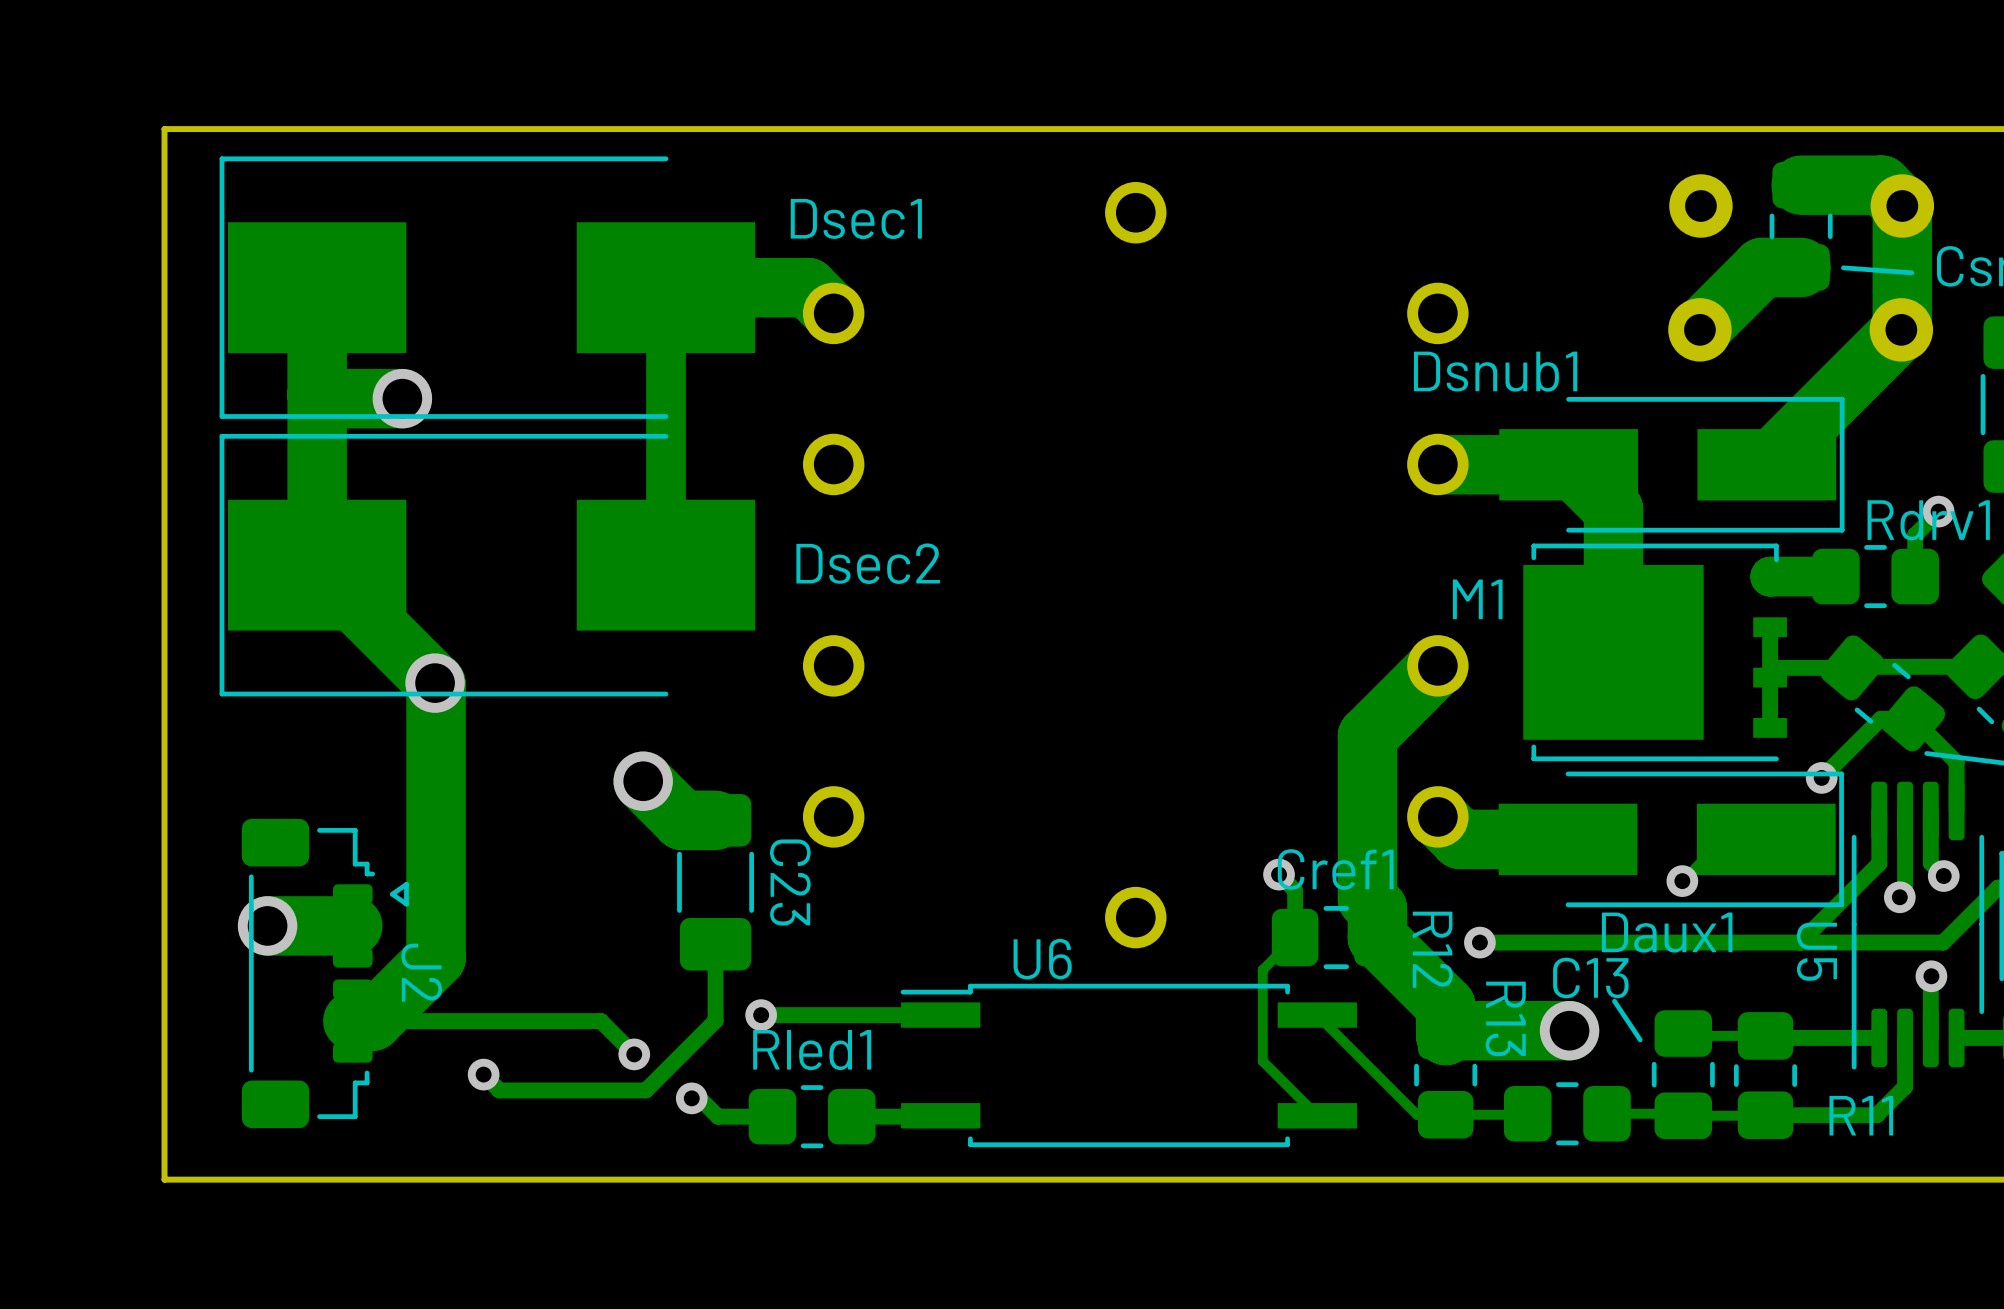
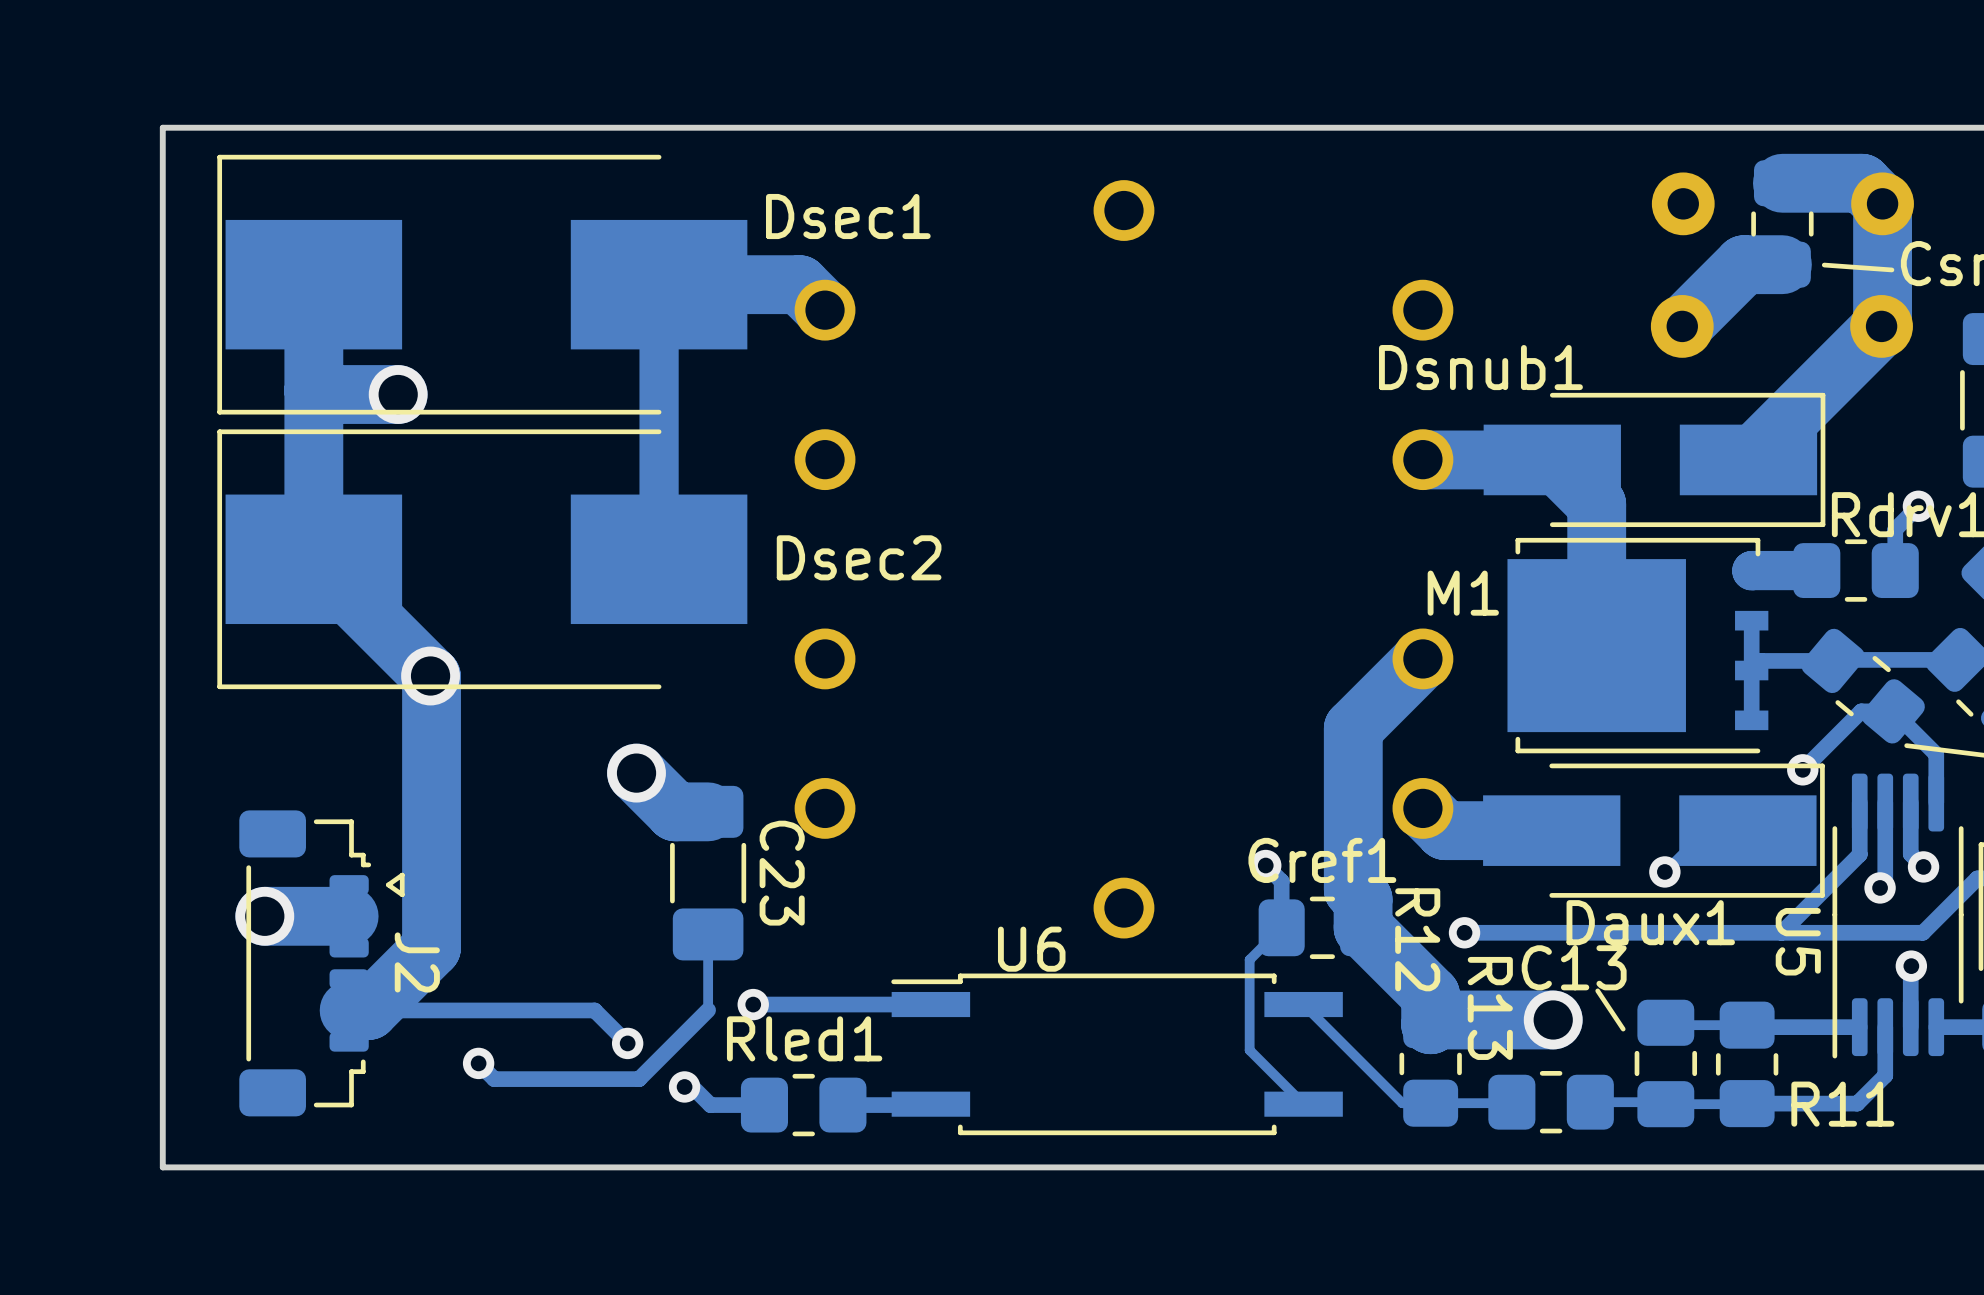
track width: thick (715, 944) (715, 1020) -> thin (708, 934) (708, 1010)

